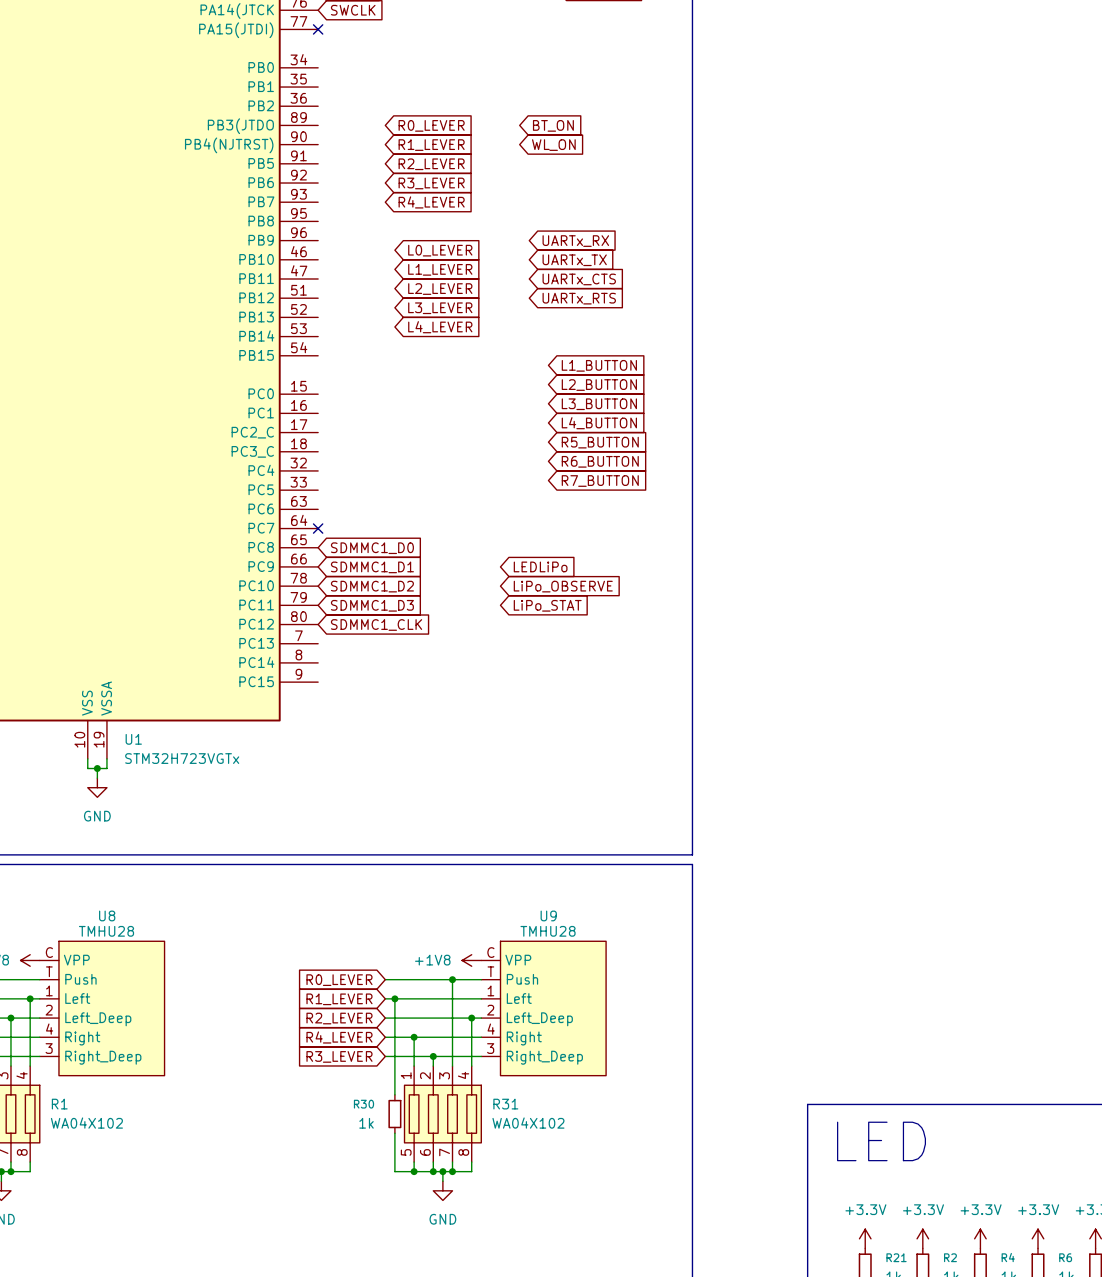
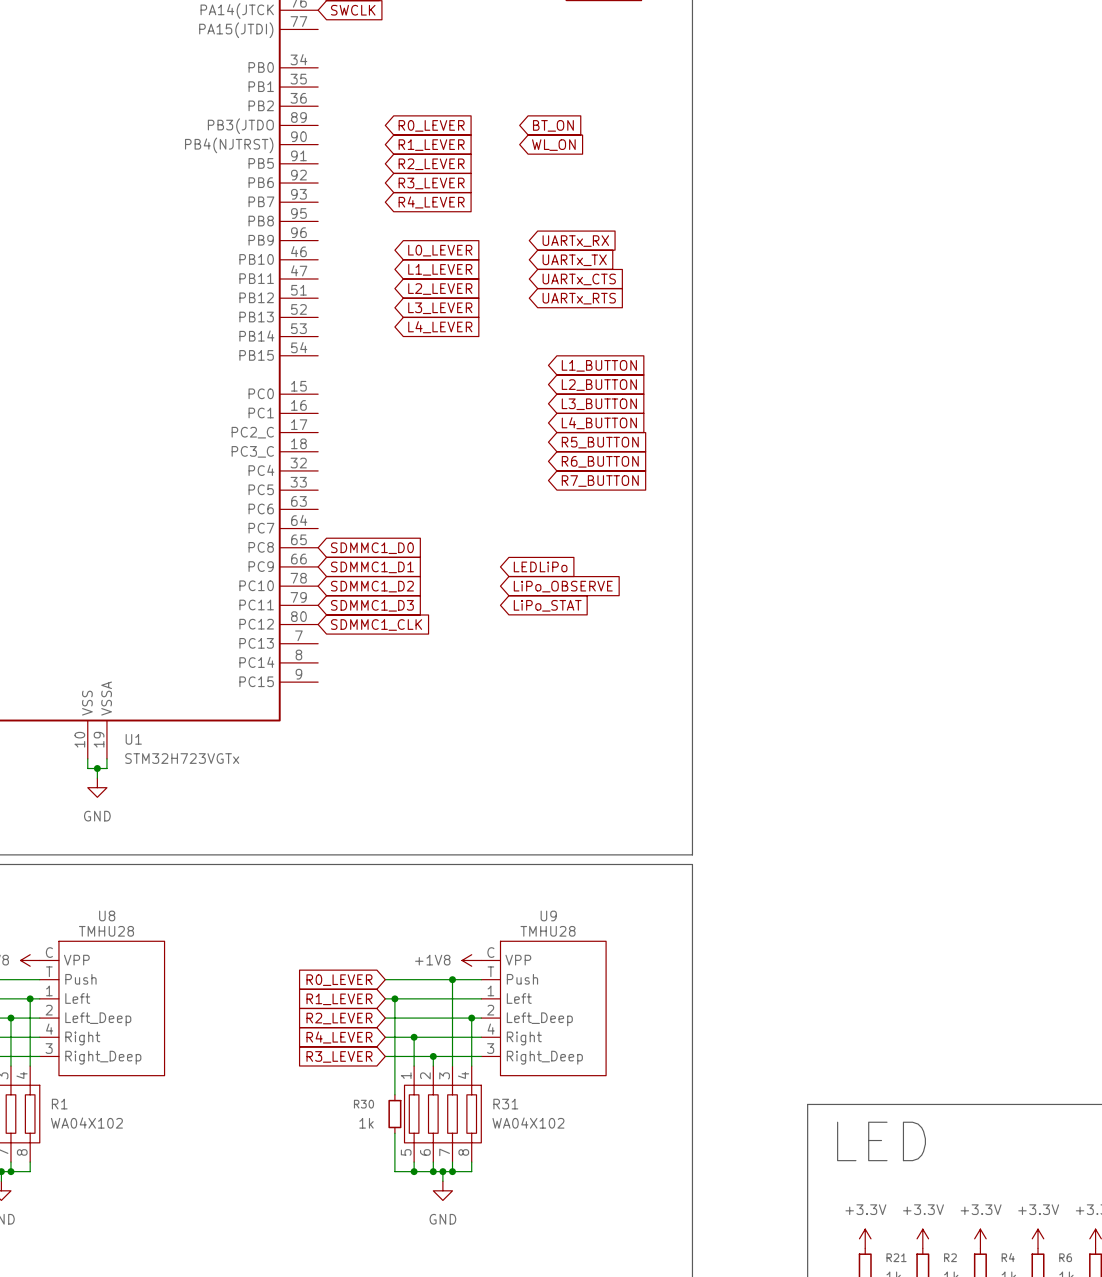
no-connect mark: (318, 29) -> none
no-connect mark: (318, 528) -> none

